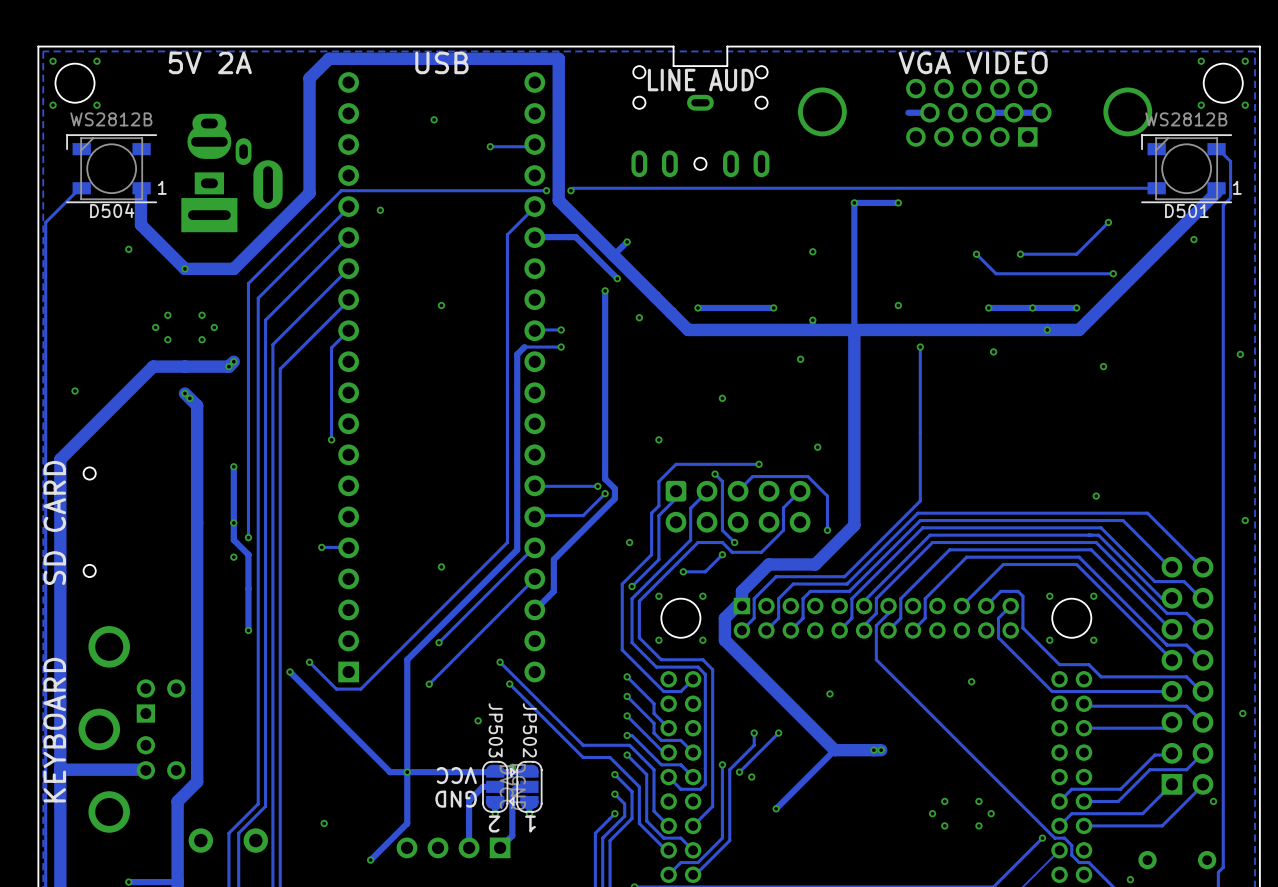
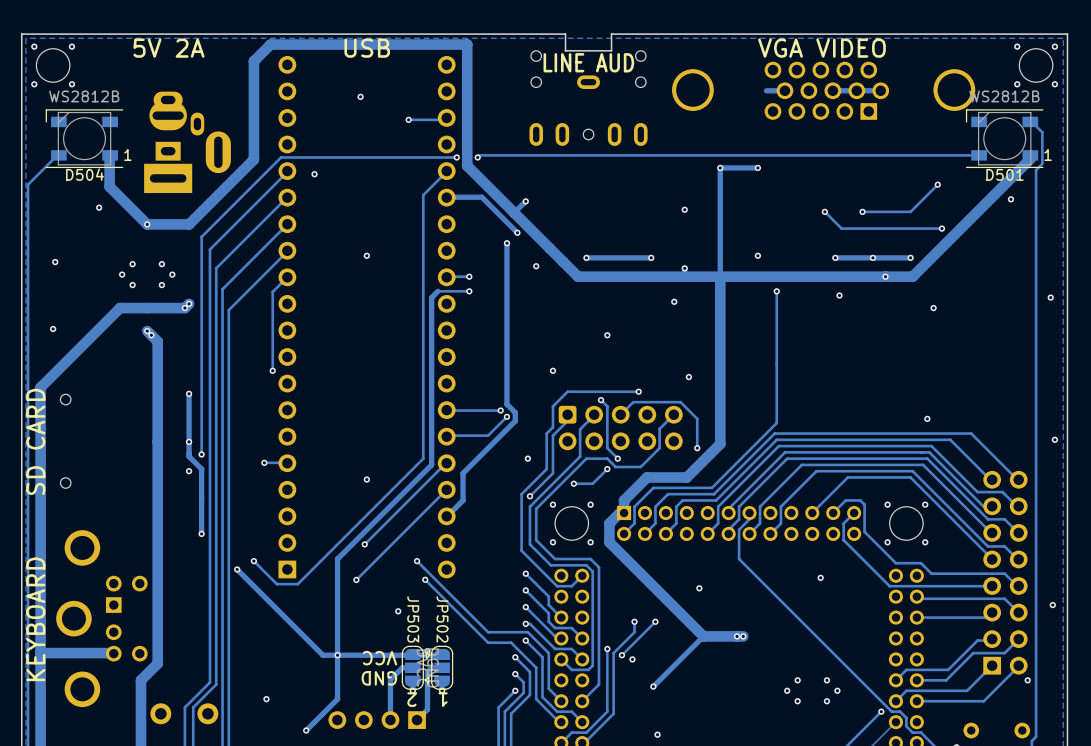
via: none -> (55, 262)
via: none -> (657, 734)

